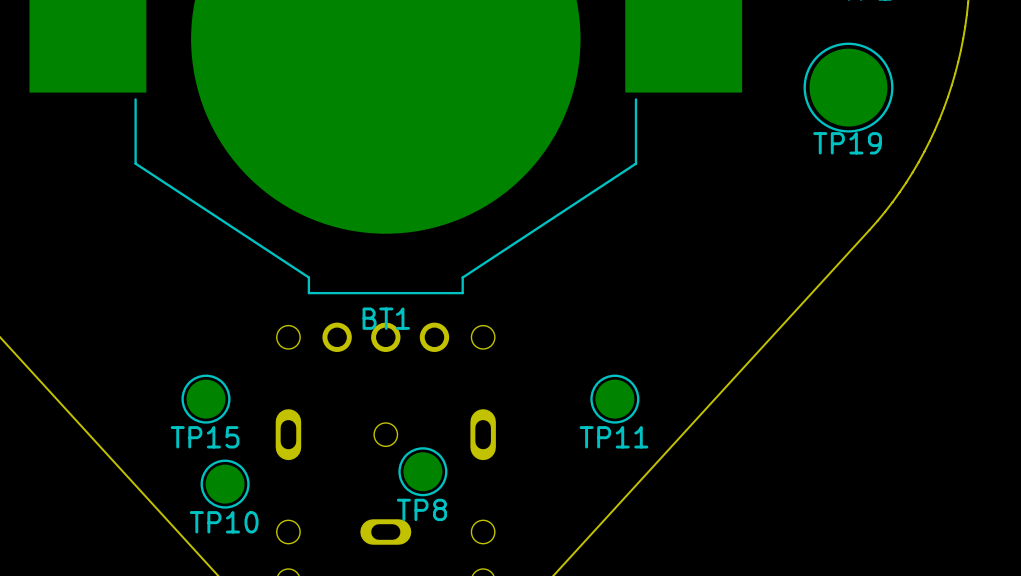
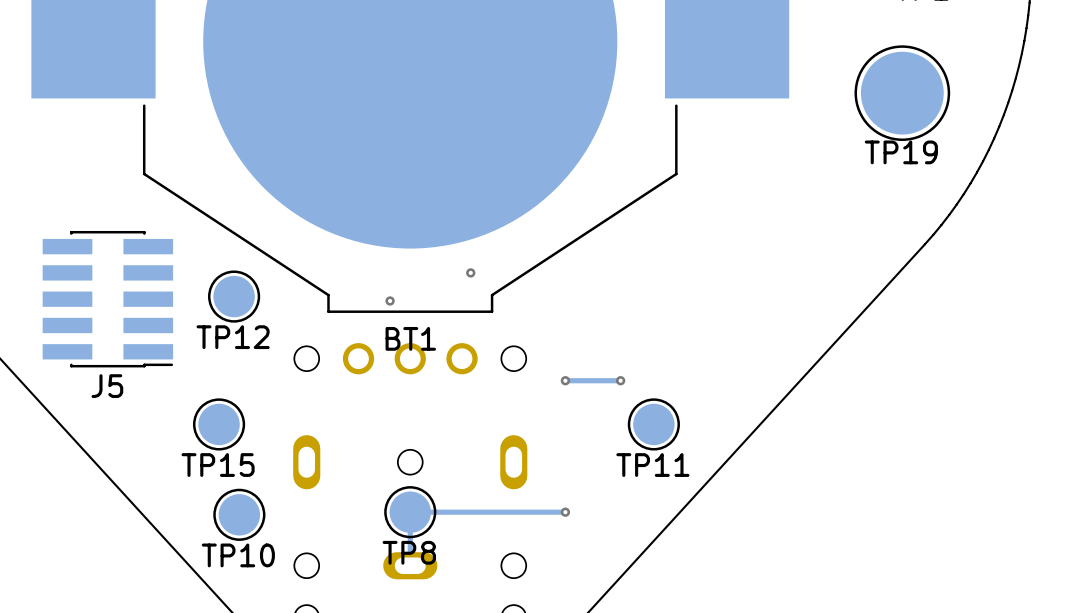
via: none -> (470, 272)
TP12: none -> (234, 296)
J5: none -> (107, 299)
via: none -> (390, 300)
via: none -> (565, 380)
track: none -> (620, 380) (565, 380)
via: none -> (620, 380)
TP8 position: (422, 471) -> (410, 512)
track: none -> (565, 512) (410, 512) (410, 565)
via: none -> (565, 512)

